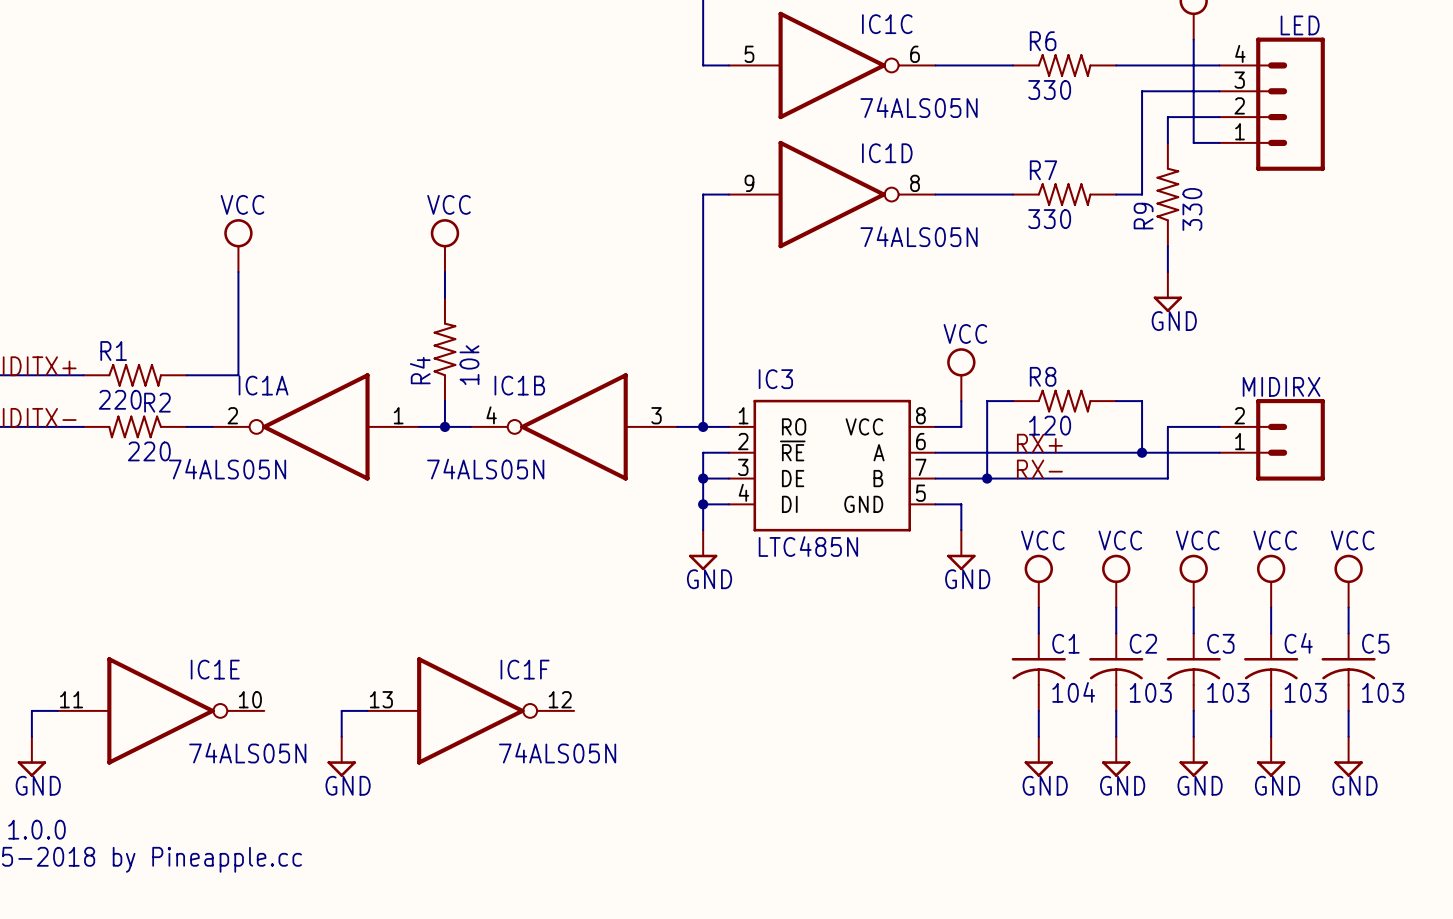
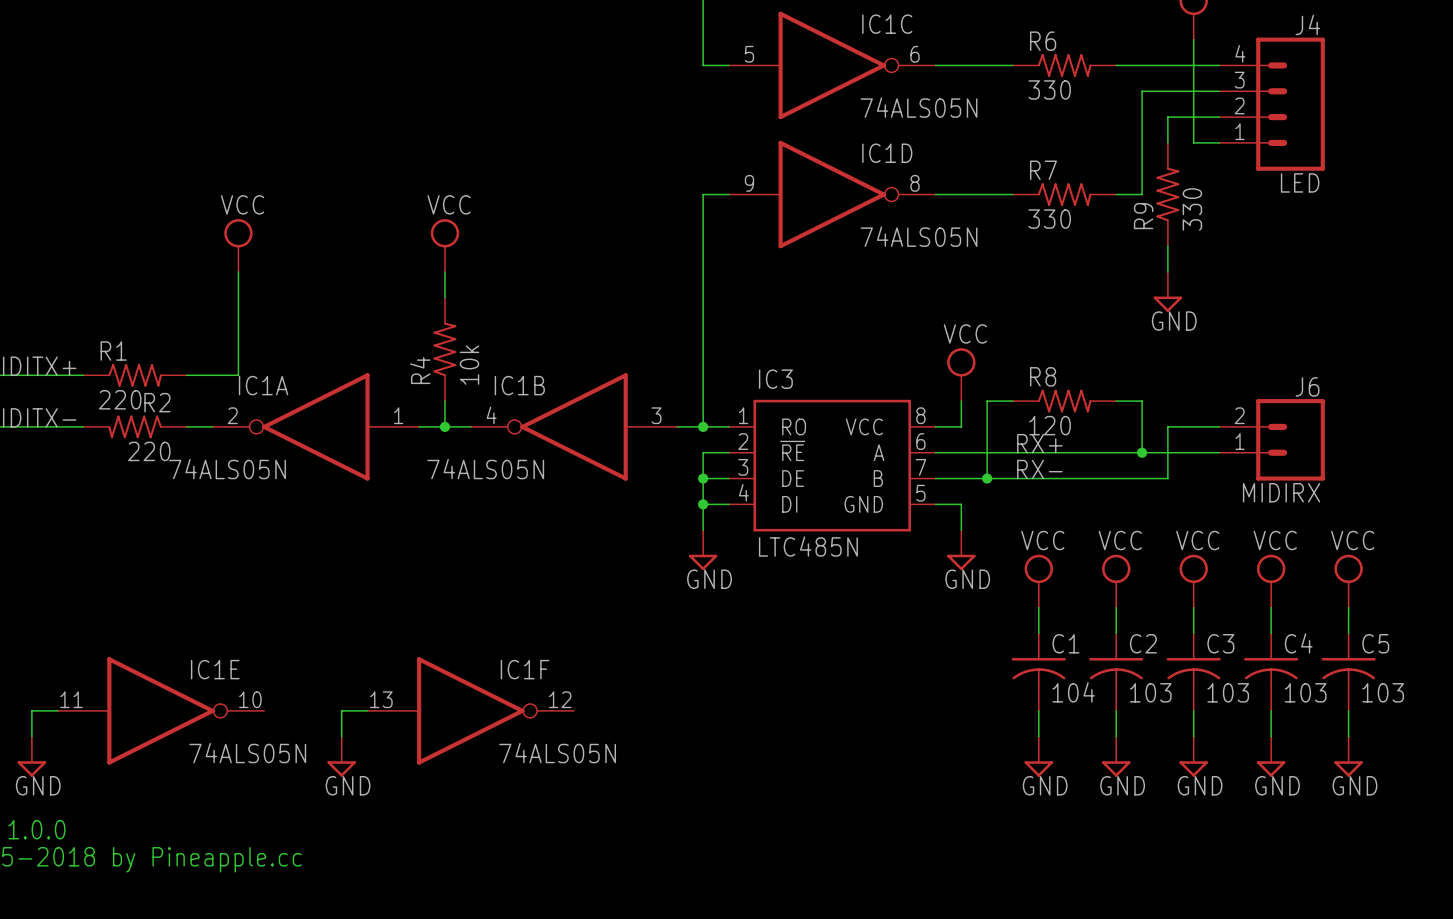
LED name: LED (1300, 25) -> J4 (1307, 25)
LED value: none -> LED (1300, 182)
MIDIRX name: MIDIRX (1281, 386) -> J6 (1307, 386)
MIDIRX value: none -> MIDIRX (1281, 492)

